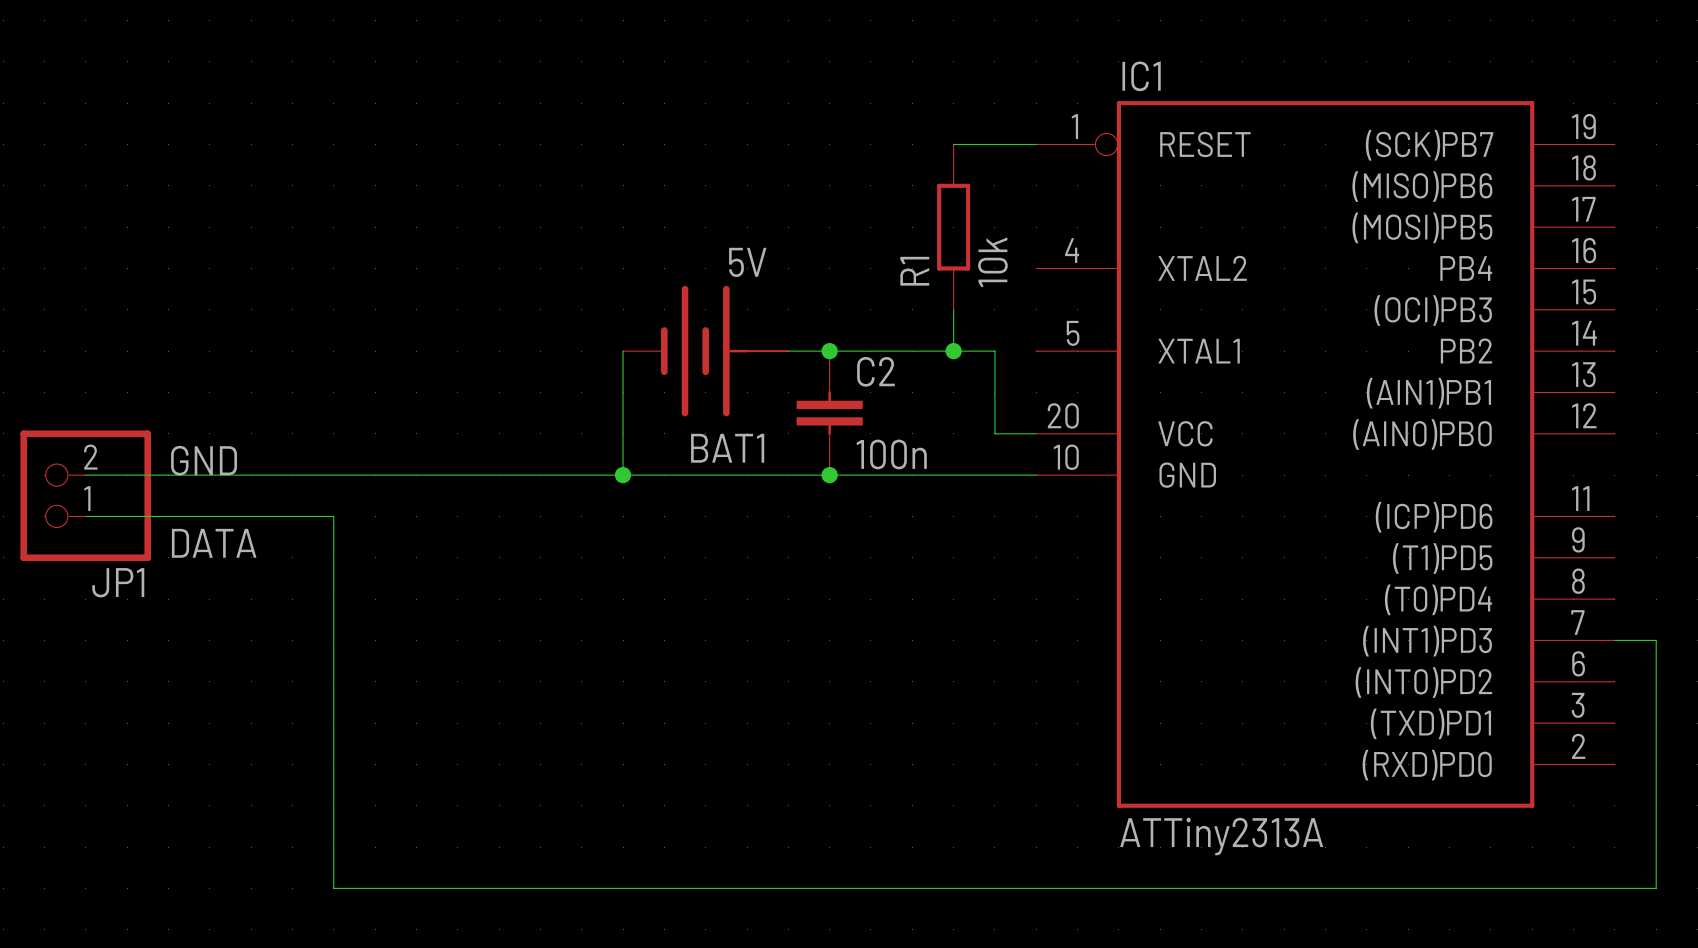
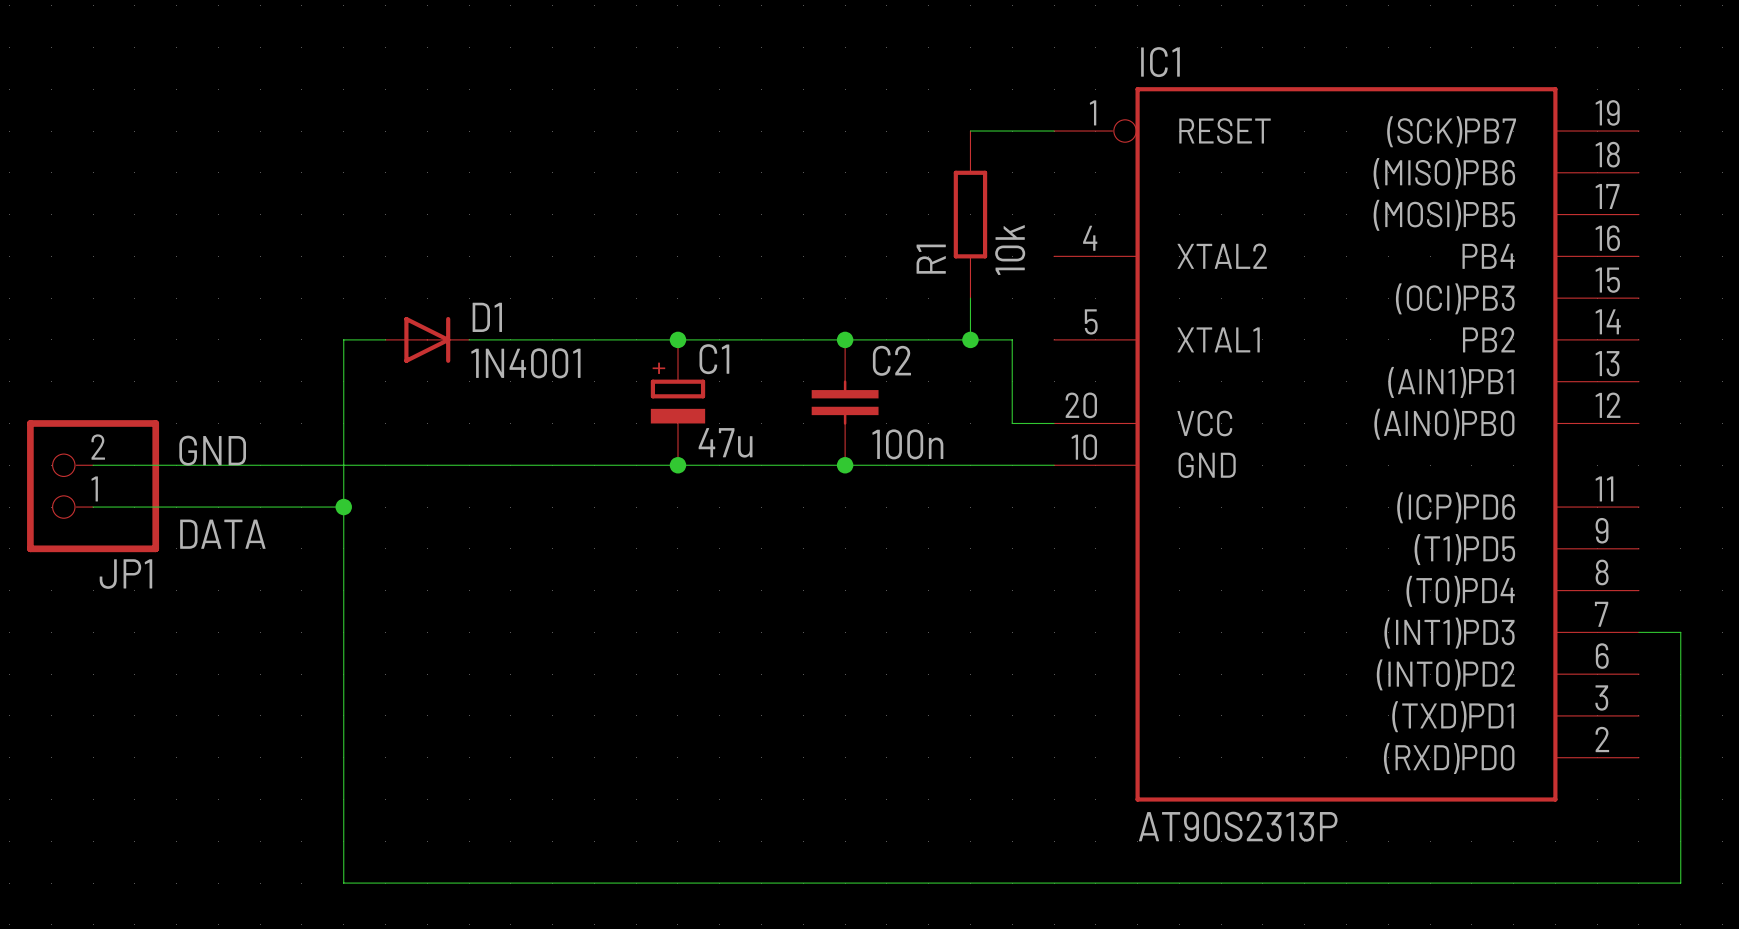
wire: none -> (385, 339) (343, 339) (343, 507)
D1: none -> 1N4001 (427, 339)
wire: none -> (469, 339) (803, 339)
wire: (623, 351) (623, 475) -> none
junction: none -> (677, 339)
BAT1: 5V (705, 351) -> none
C1: none -> 47u (677, 402)
junction position: (623, 475) -> (677, 465)
junction: none -> (343, 507)
IC1 value: ATTiny2313A (1221, 836) -> AT90S2313P (1238, 826)

